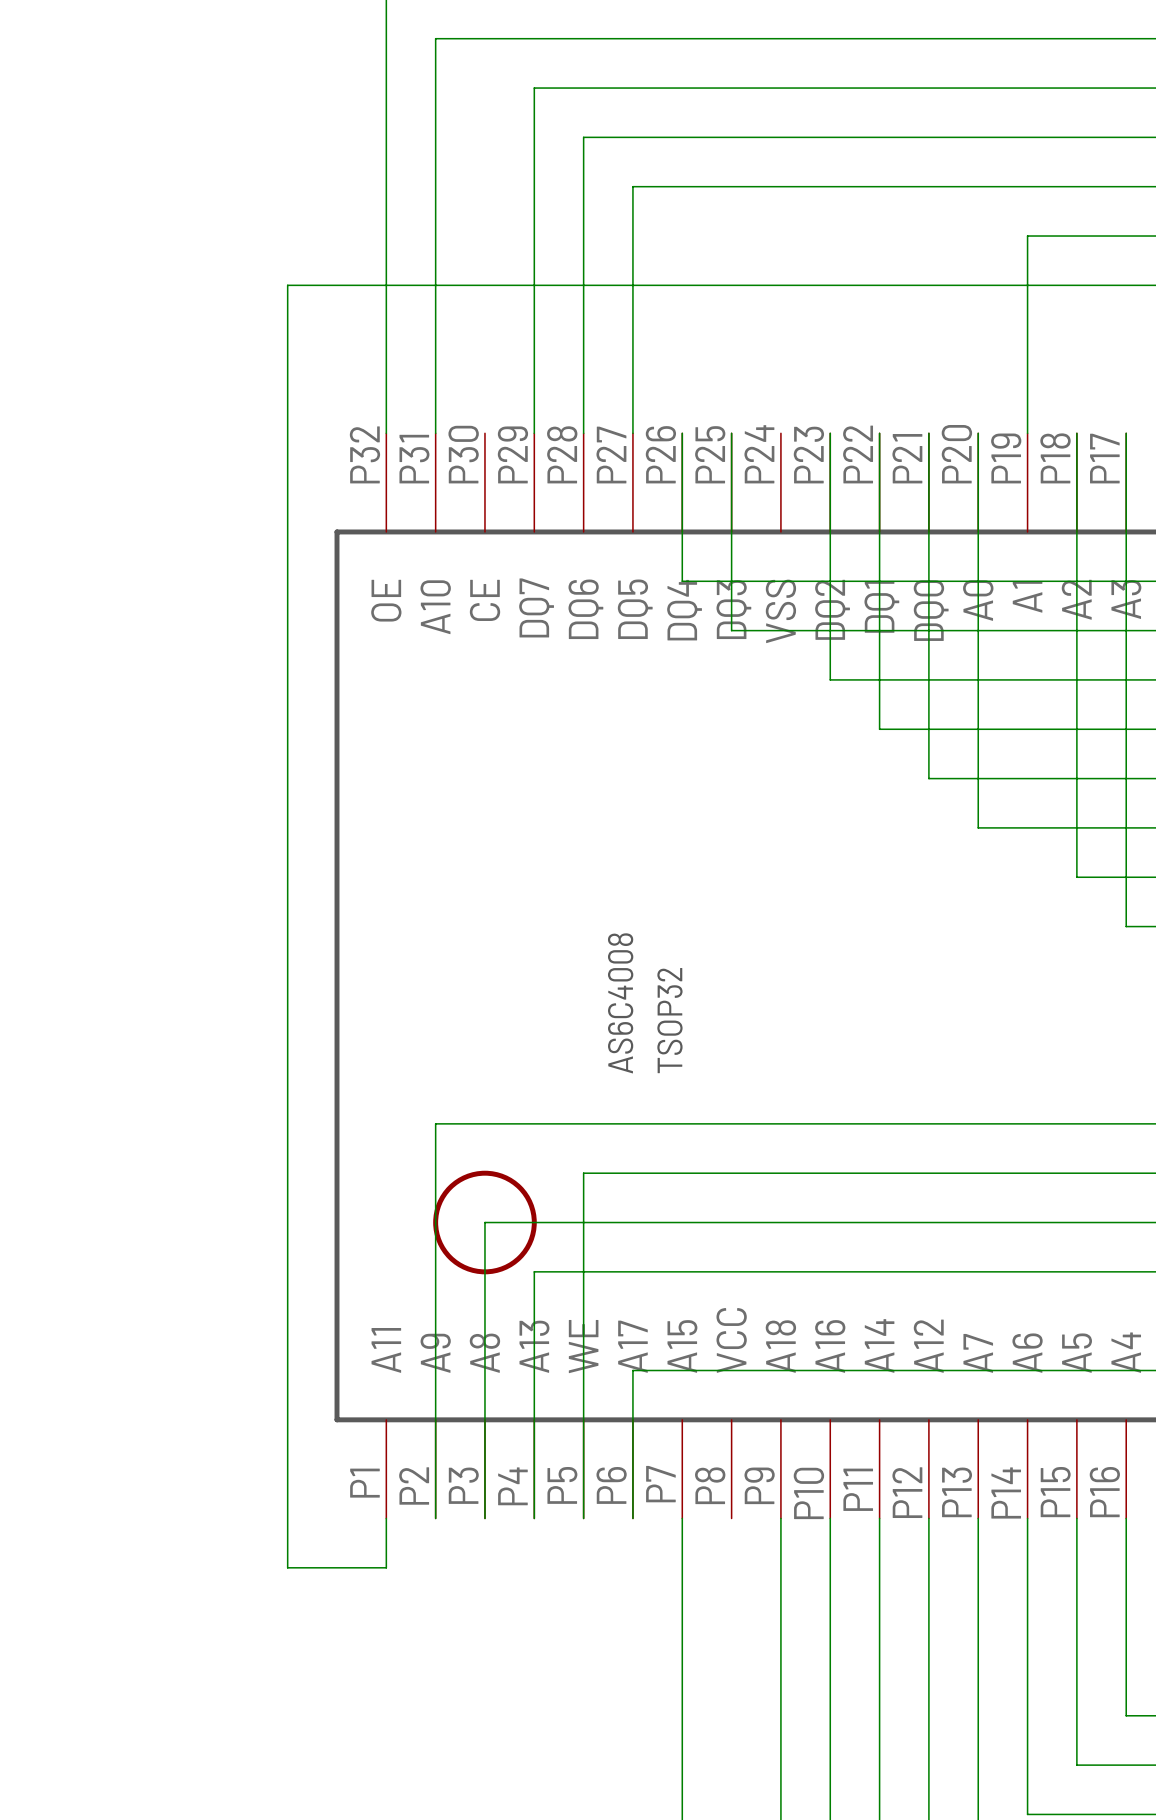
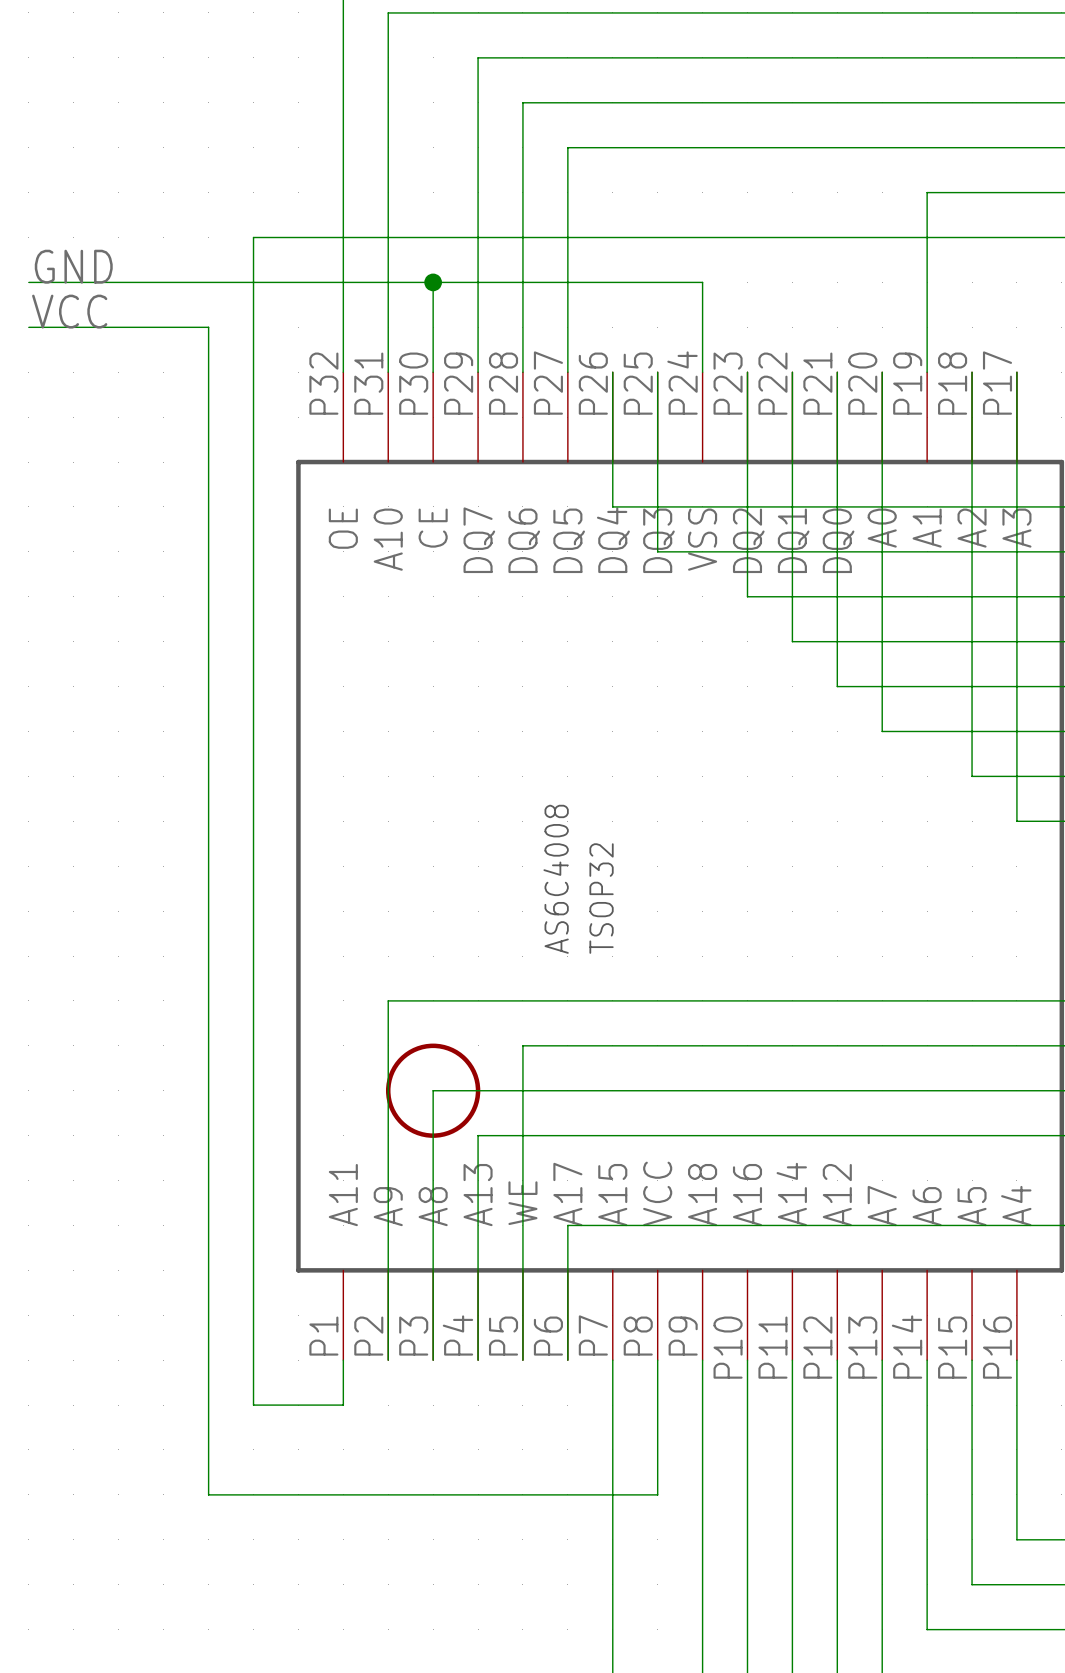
label: none -> GND (73, 266)
wire: none -> (28, 282) (702, 282) (702, 372)
wire: none -> (433, 282) (433, 372)
junction: none -> (433, 282)
label: none -> VCC (69, 311)
wire: none -> (28, 327) (208, 327) (208, 1494) (657, 1494) (657, 1360)

